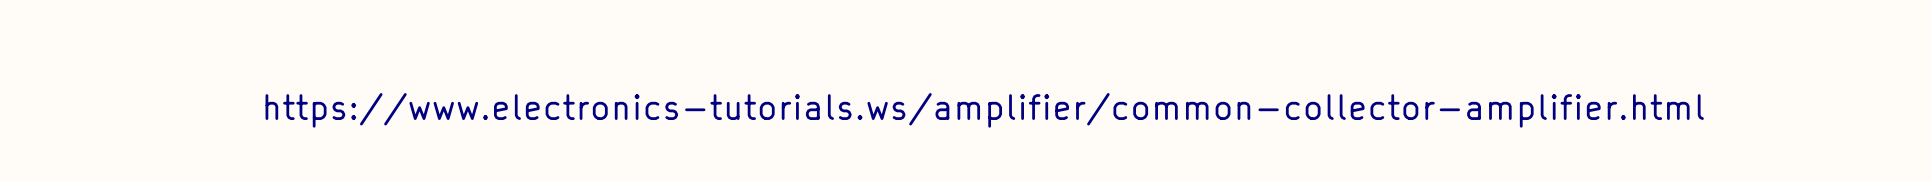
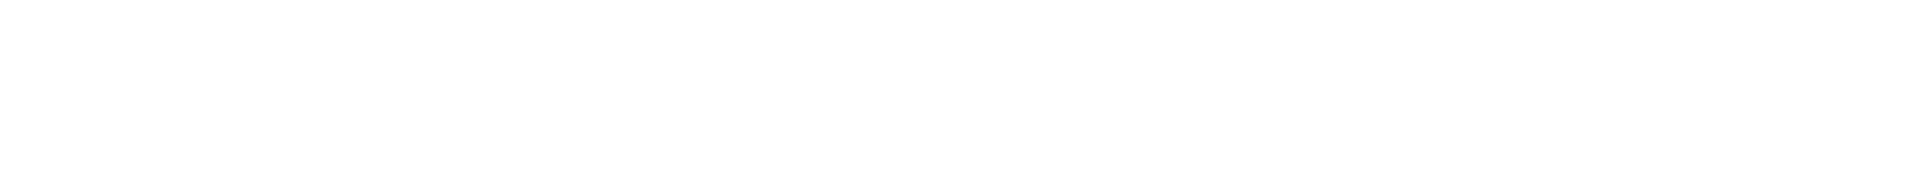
text: https://www.electronics-tutorials.ws/amplifier/common-collector-amplifier.html (984, 110) -> none

